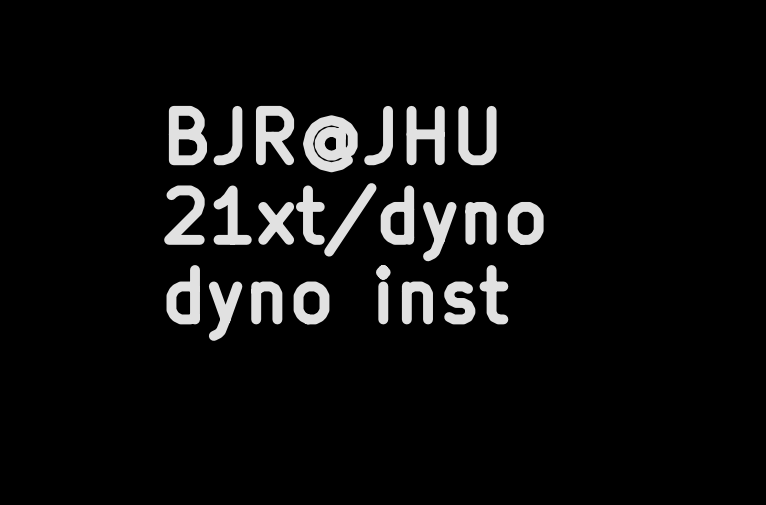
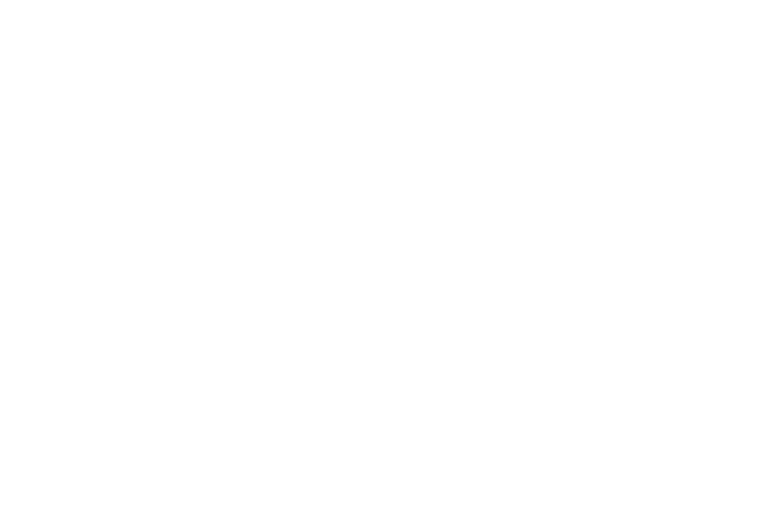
text: BJR@JHU (332, 139) -> none
text: 21xt/dyno (353, 222) -> none
text: dyno inst (337, 302) -> none

